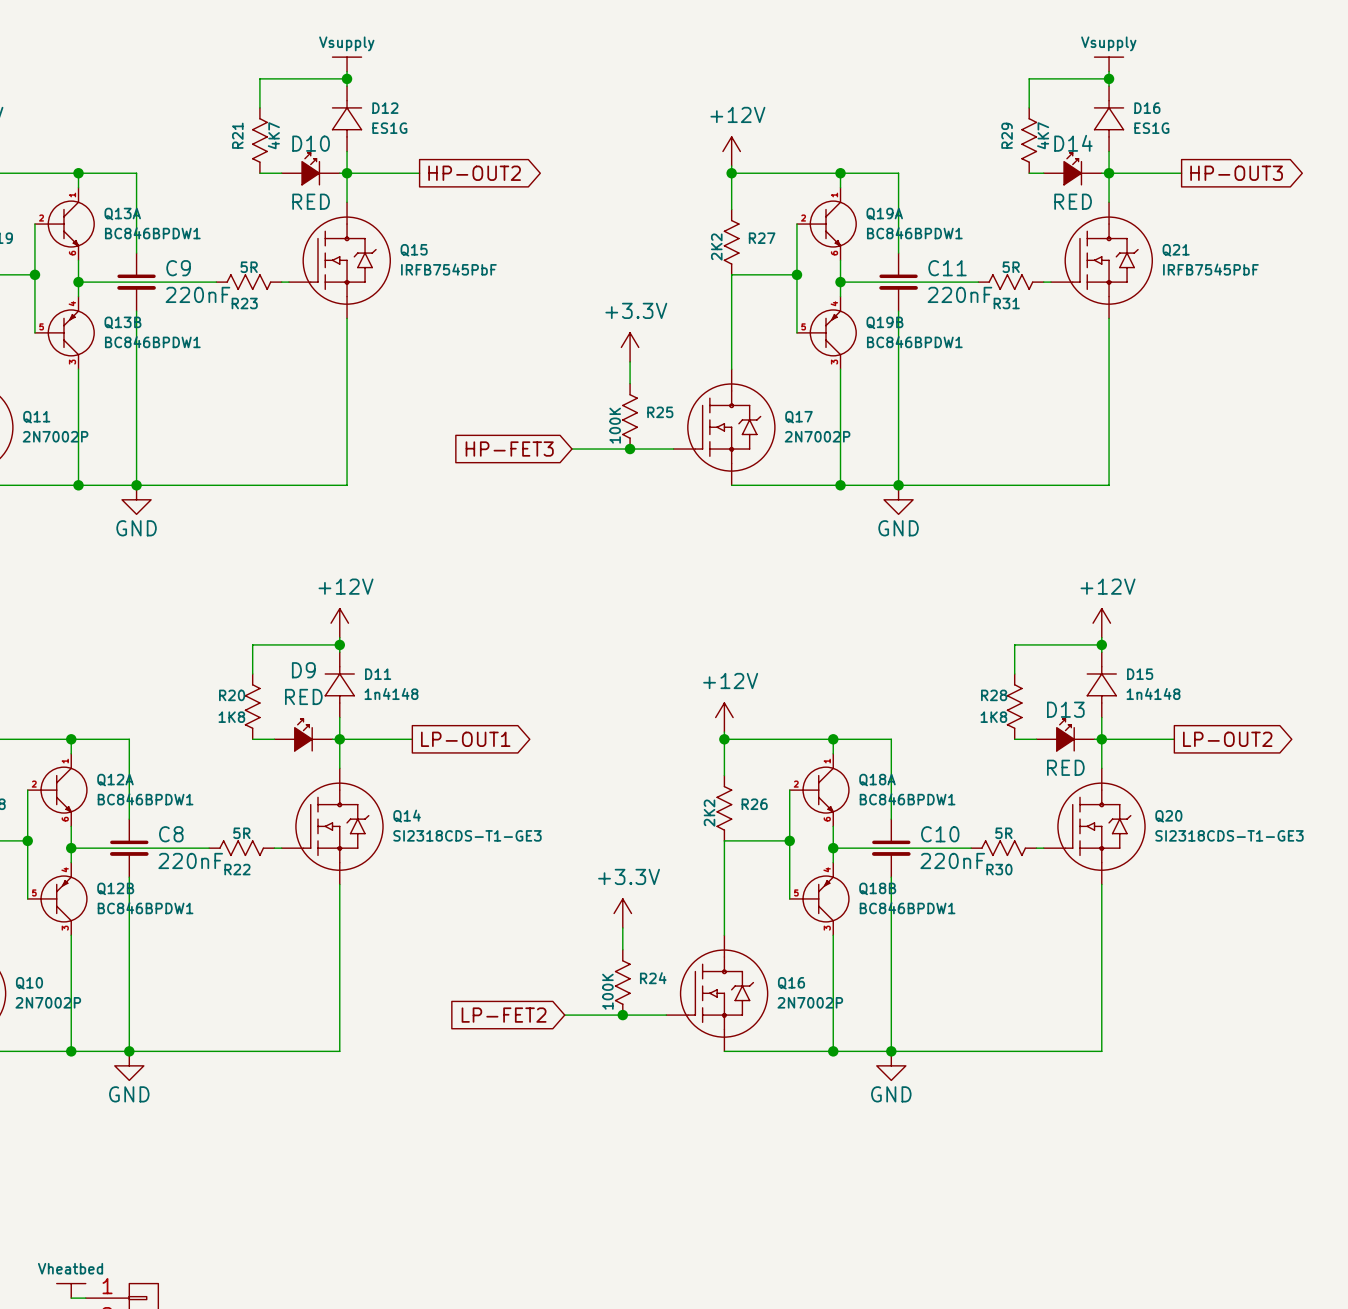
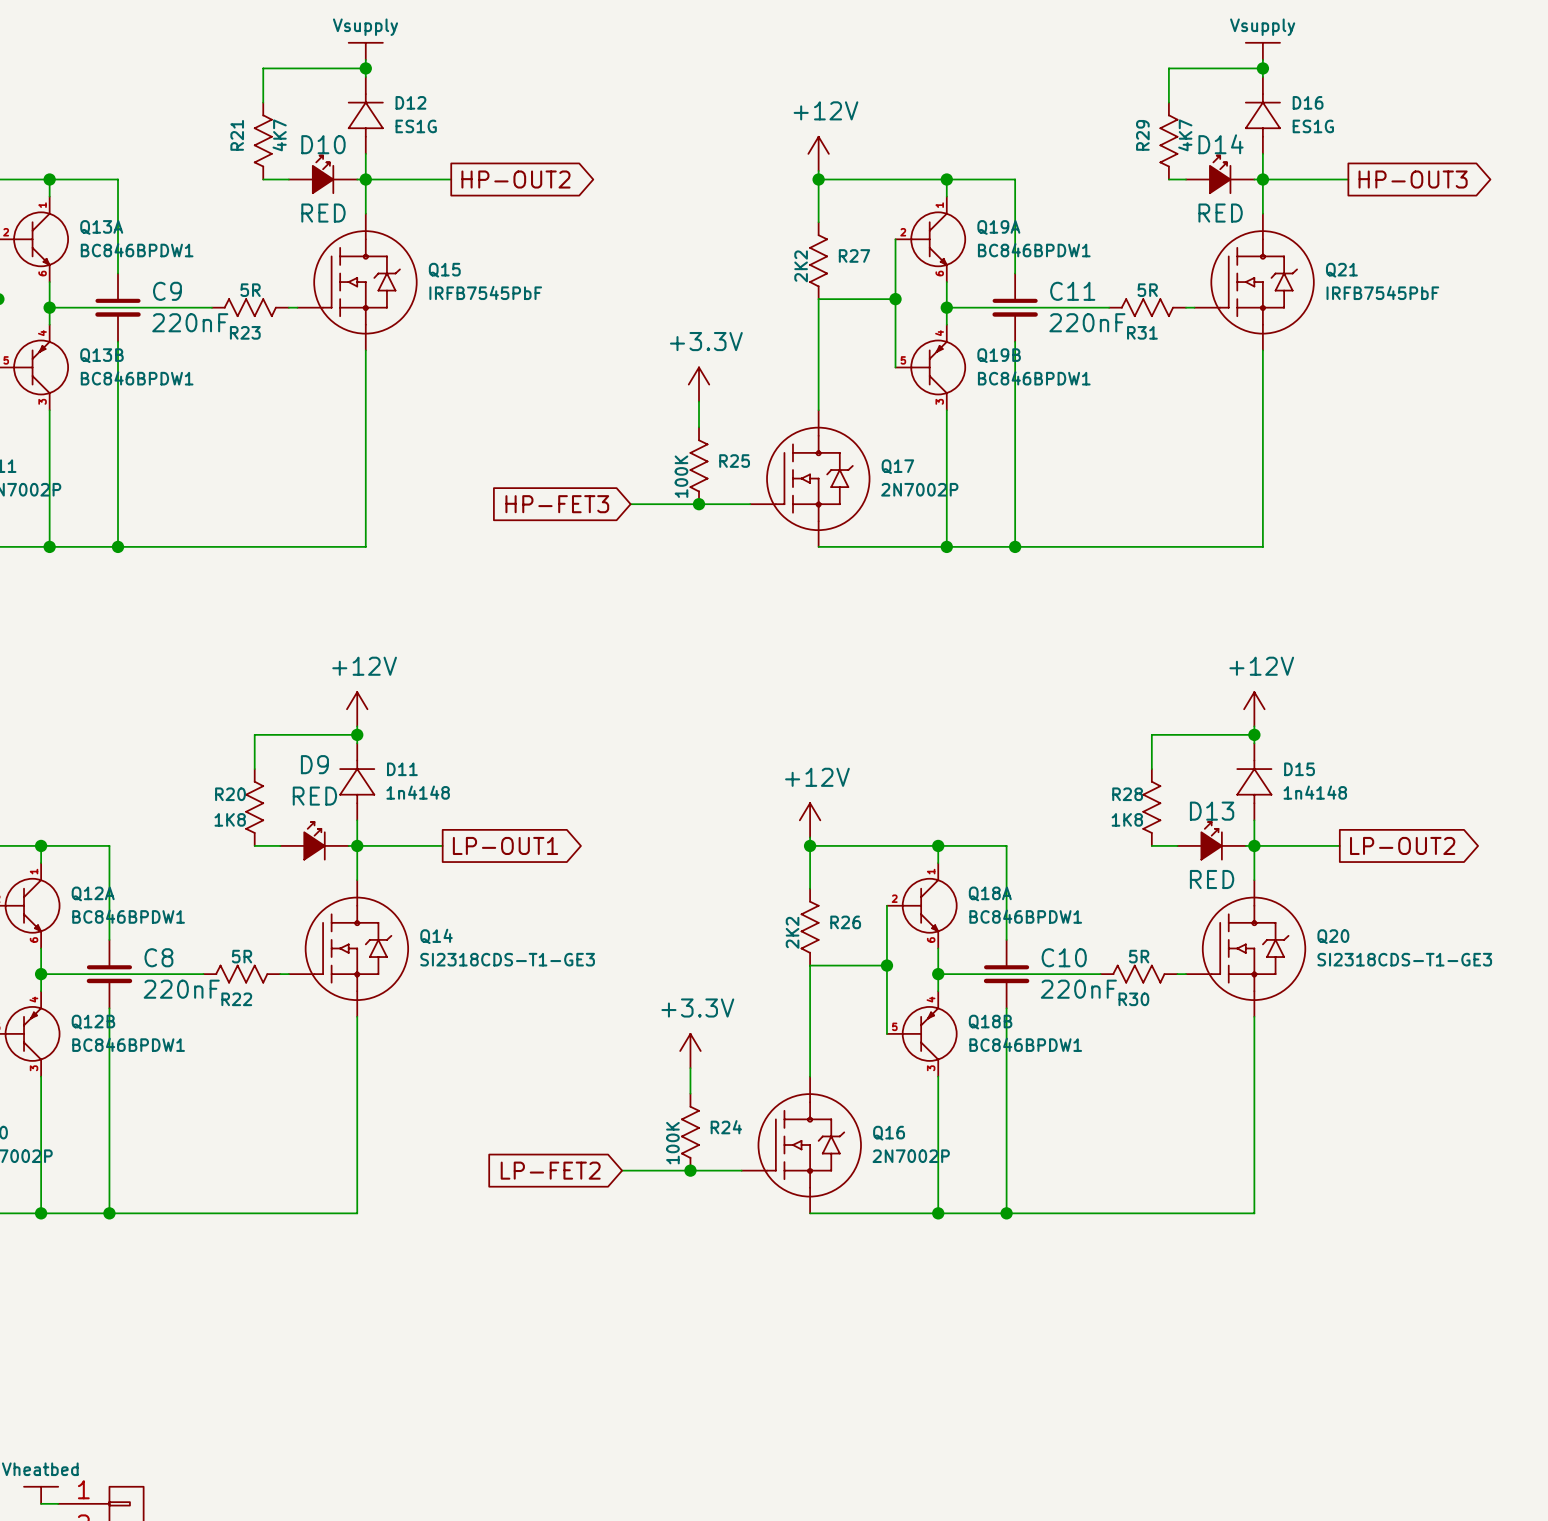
power symbol: GND (136, 499) -> none
power symbol: GND (898, 499) -> none
power symbol: GND (129, 1065) -> none
power symbol: GND (891, 1065) -> none

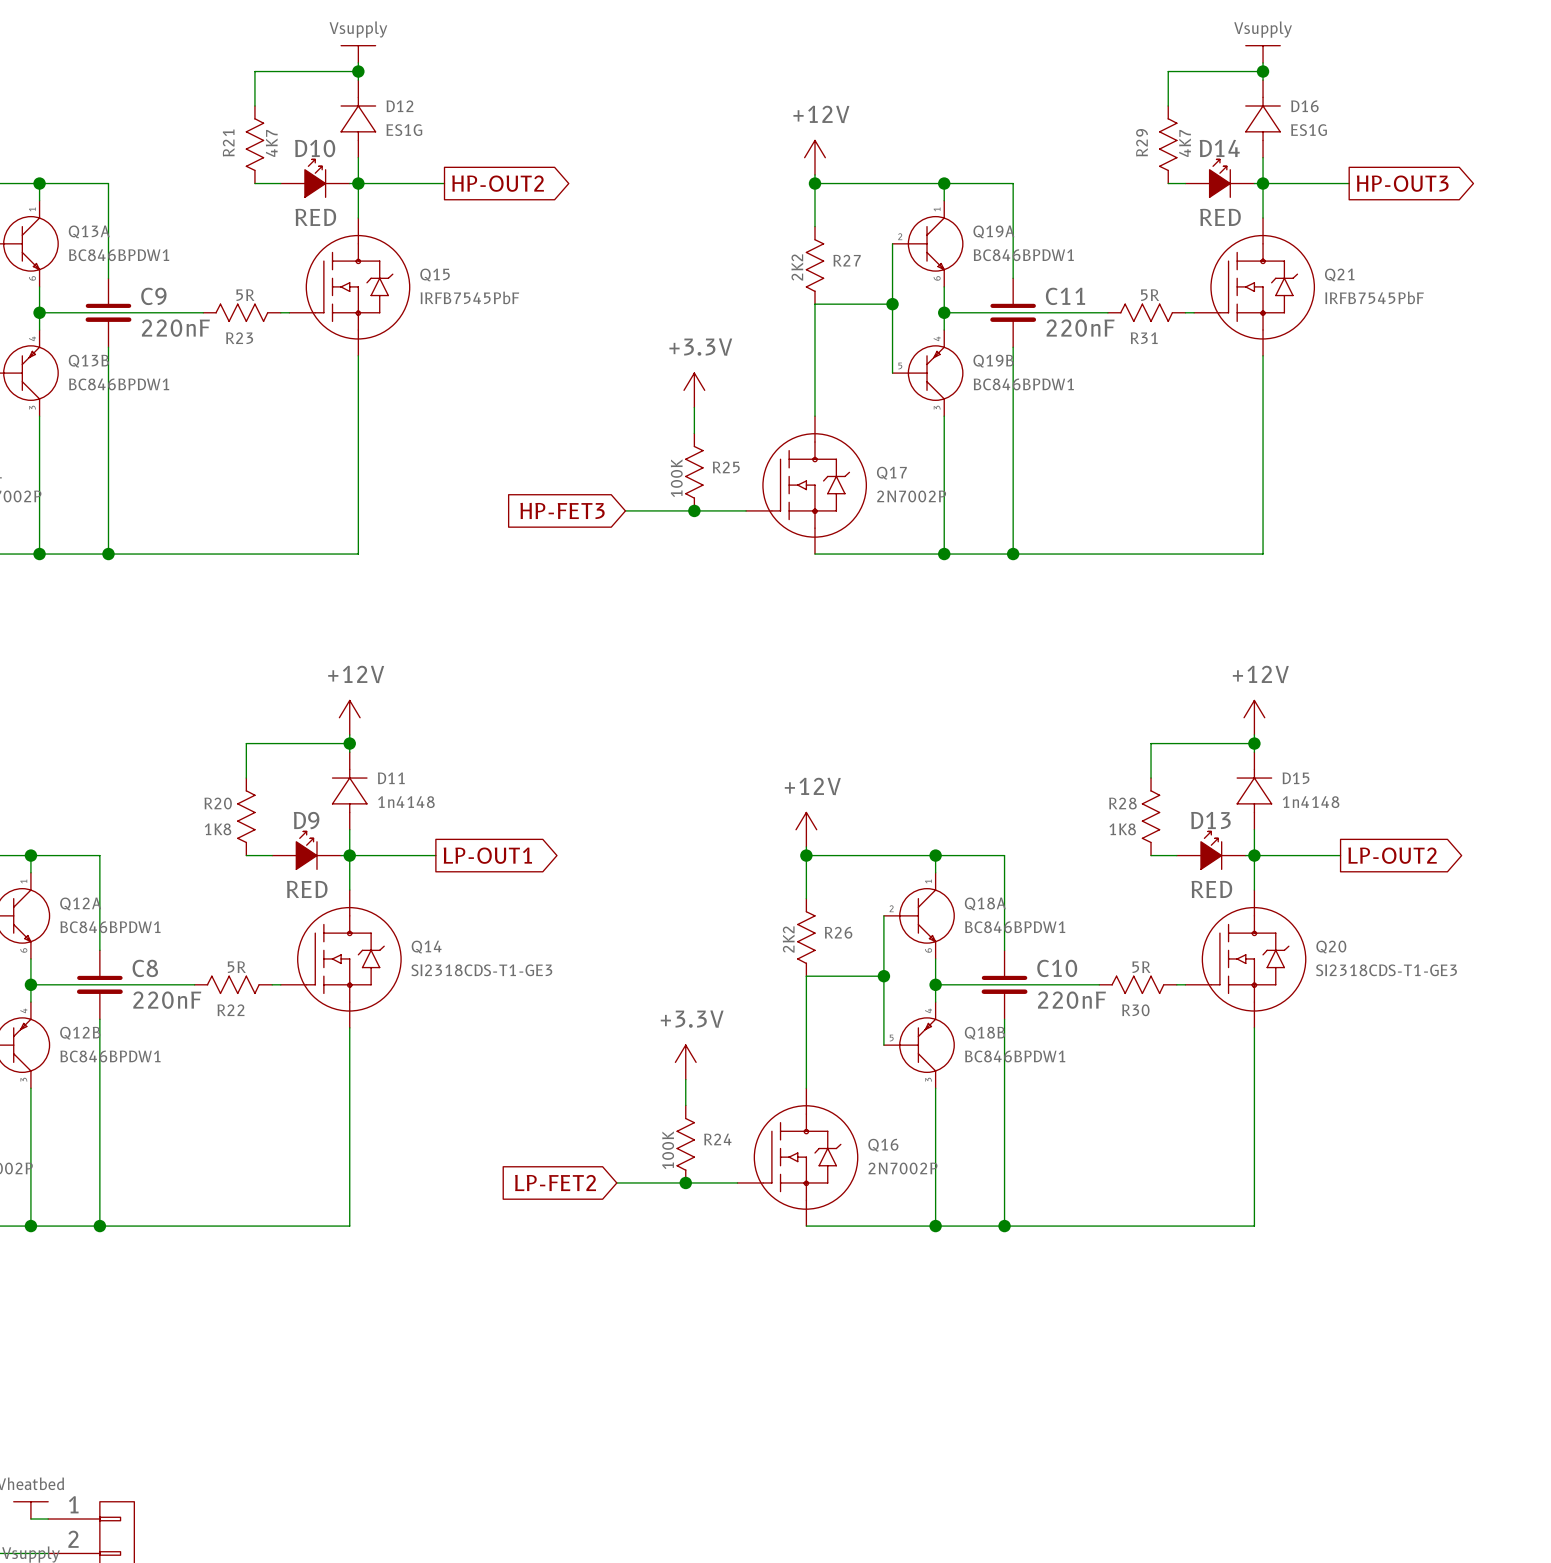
D9 name position: D9 (314, 764) -> D9 (306, 820)
D9 value position: RED (314, 796) -> RED (307, 889)

